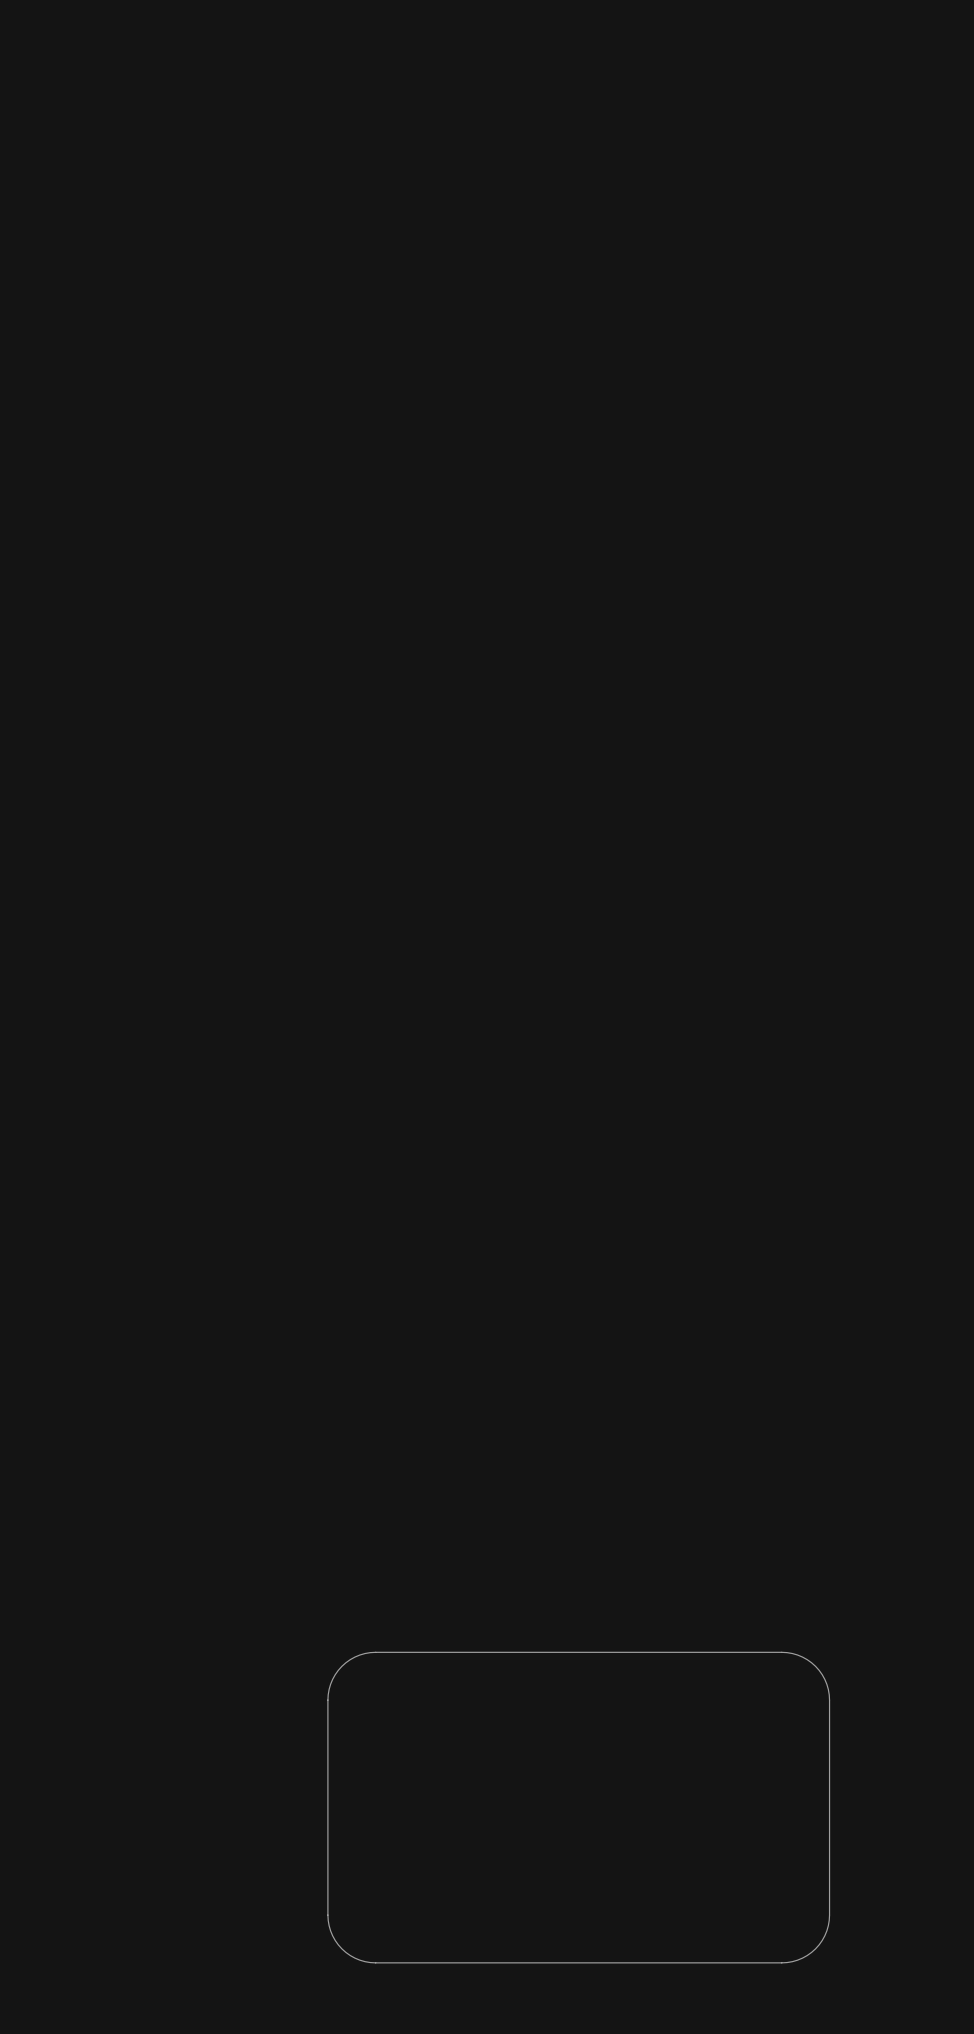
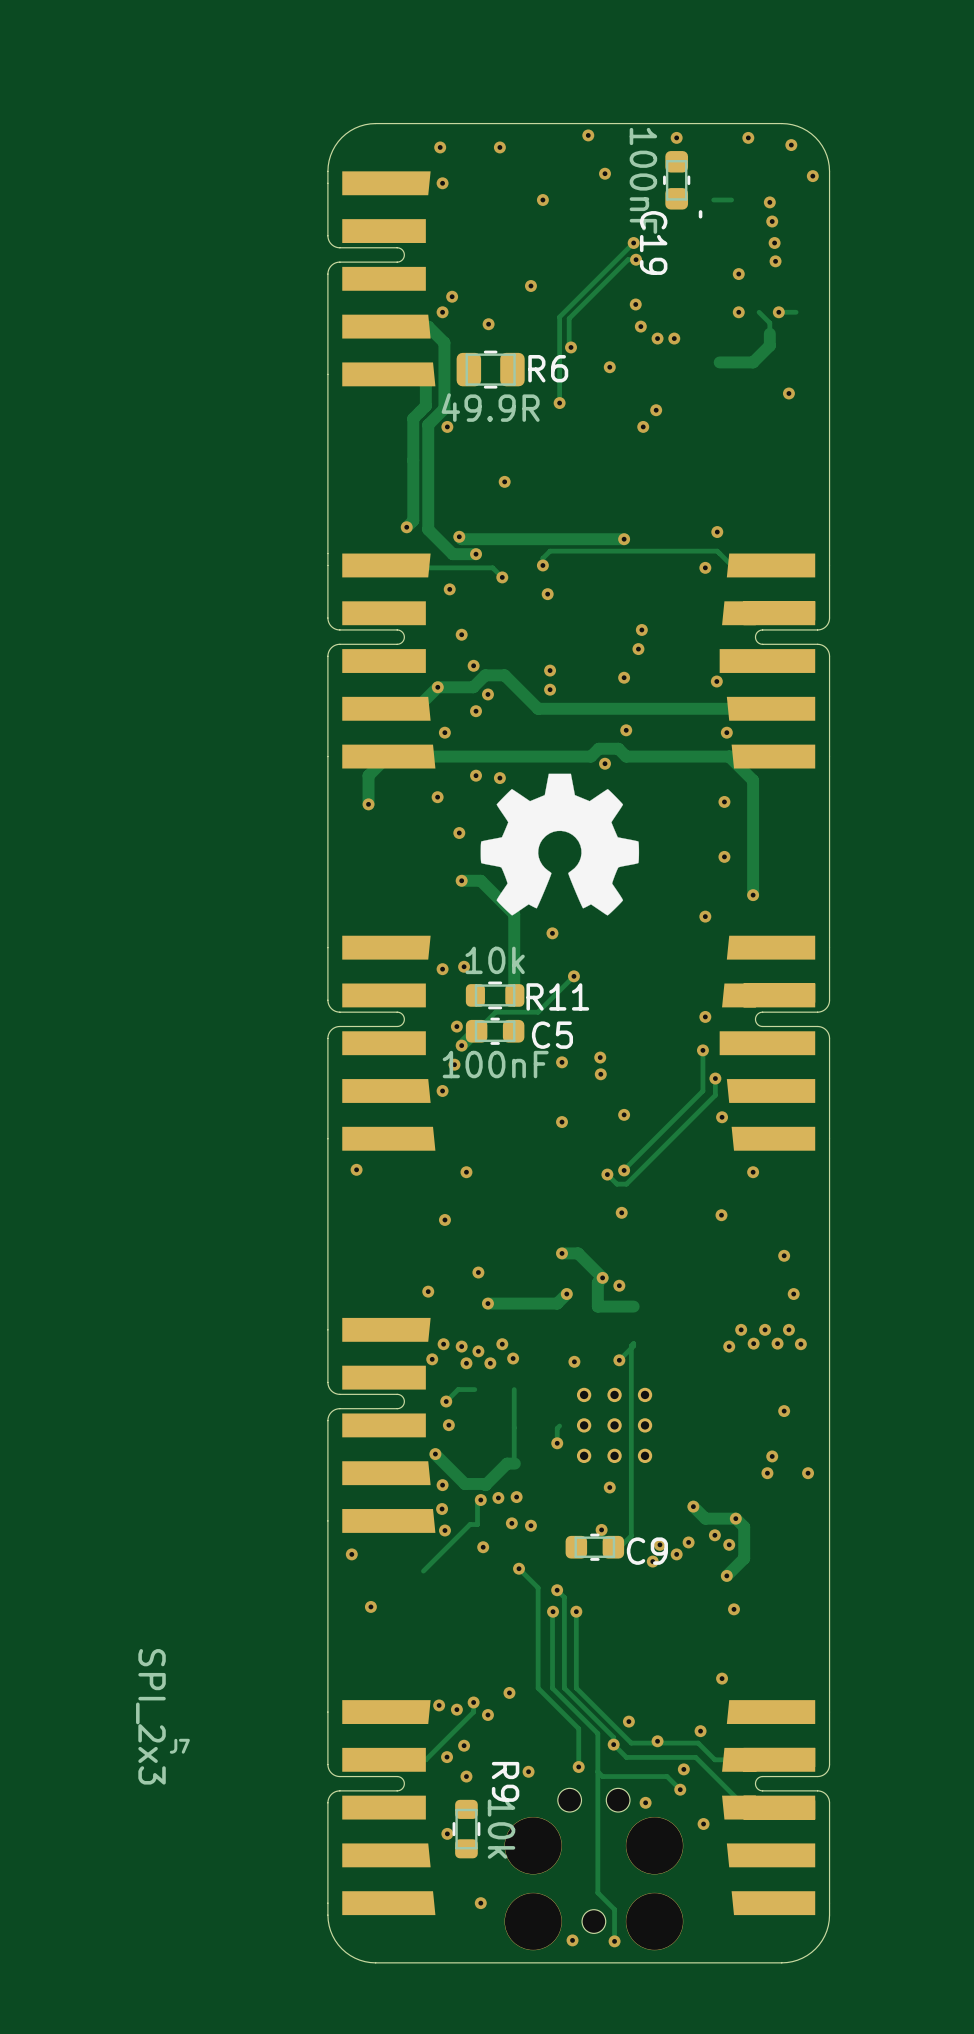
via: none -> (588, 135)
via: none -> (676, 137)
via: none -> (748, 137)
via: none -> (791, 145)
via: none -> (440, 147)
via: none -> (499, 147)
via: none -> (605, 173)
via: none -> (812, 176)
C19: none -> 100nF (676, 180)
board edge: none -> (327, 183) (329, 160) (338, 141) (354, 128) (370, 123) (781, 123) (797, 126) (811, 133) (824, 150) (829, 171) (829, 565)
via: none -> (442, 183)
via: none -> (542, 200)
track: none -> (731, 200) (713, 200)
via: none -> (769, 202)
line: none -> (700, 211) (700, 216)
via: none -> (772, 221)
track: none -> (633, 243) (559, 317) (559, 403)
via: none -> (633, 243)
via: none -> (774, 243)
track: none -> (636, 259) (628, 259) (569, 318) (569, 345) (571, 347)
via: none -> (636, 259)
via: none -> (775, 261)
via: none -> (738, 274)
part: none -> (381, 278)
via: none -> (530, 285)
via: none -> (452, 296)
via: none -> (635, 304)
via: none -> (442, 312)
via: none -> (738, 312)
track: none -> (759, 312) (769, 323) (769, 345) (753, 362) (719, 362)
via: none -> (778, 312)
track: none -> (796, 312) (778, 312)
via: none -> (488, 324)
track: none -> (385, 326) (428, 326) (444, 342) (444, 408) (428, 424) (428, 529) (452, 554) (476, 554)
via: none -> (640, 326)
via: none -> (657, 338)
via: none -> (674, 338)
via: none -> (571, 347)
via: none -> (609, 367)
R6: none -> 49.9R (490, 369)
board edge: none -> (327, 374) (327, 565)
track: none -> (387, 374) (416, 374) (425, 383) (425, 406) (413, 418) (413, 520) (406, 527)
via: none -> (788, 393)
via: none -> (559, 403)
via: none -> (656, 410)
via: none -> (447, 426)
via: none -> (643, 426)
via: none -> (504, 481)
via: none -> (406, 527)
via: none -> (717, 532)
track: none -> (459, 536) (461, 539) (624, 539)
via: none -> (459, 536)
via: none -> (624, 539)
via: none -> (476, 554)
track: none -> (385, 565) (387, 567) (492, 567) (502, 577)
via: none -> (542, 565)
track: none -> (772, 565) (731, 565) (717, 551) (550, 551) (542, 558) (542, 565)
via: none -> (705, 567)
via: none -> (502, 577)
via: none -> (449, 589)
via: none -> (547, 594)
via: none -> (641, 629)
via: none -> (461, 634)
via: none -> (638, 649)
part: none -> (381, 661)
part: none -> (774, 661)
via: none -> (473, 665)
via: none -> (550, 670)
via: none -> (624, 677)
via: none -> (716, 681)
via: none -> (437, 687)
via: none -> (550, 689)
via: none -> (487, 694)
track: none -> (772, 708) (538, 708) (504, 675) (485, 675) (473, 687) (437, 687) (416, 708) (385, 708)
via: none -> (476, 711)
via: none -> (626, 730)
via: none -> (444, 732)
via: none -> (726, 732)
board edge: none -> (327, 756) (327, 947)
track: none -> (729, 756) (753, 780) (753, 895)
track: none -> (774, 756) (626, 756) (618, 748) (598, 748) (590, 756) (387, 756) (368, 775) (368, 804)
board edge: none -> (829, 756) (829, 947)
via: none -> (605, 763)
drawing: none -> [480, 773, 640, 916]
via: none -> (476, 775)
via: none -> (499, 778)
via: none -> (437, 797)
via: none -> (724, 801)
via: none -> (368, 804)
via: none -> (459, 833)
via: none -> (724, 856)
track: none -> (461, 880) (480, 880) (514, 914) (514, 995)
via: none -> (461, 880)
via: none -> (753, 895)
via: none -> (705, 916)
via: none -> (552, 933)
via: none -> (464, 966)
via: none -> (442, 969)
track: none -> (573, 976) (538, 1012) (495, 1012) (461, 1045)
via: none -> (573, 976)
R11: none -> 10k (495, 995)
via: none -> (705, 1016)
via: none -> (456, 1026)
C5: none -> 100nF (495, 1031)
part: none -> (381, 1043)
part: none -> (774, 1043)
via: none -> (461, 1045)
track: none -> (702, 1050) (702, 1090) (624, 1170)
via: none -> (702, 1050)
via: none -> (600, 1057)
via: none -> (562, 1062)
via: none -> (454, 1064)
via: none -> (600, 1074)
track: none -> (715, 1078) (715, 1095) (626, 1184) (616, 1184) (607, 1174)
via: none -> (715, 1078)
via: none -> (442, 1090)
via: none -> (624, 1114)
via: none -> (722, 1117)
via: none -> (562, 1122)
board edge: none -> (829, 1138) (829, 1700)
via: none -> (356, 1169)
via: none -> (624, 1170)
via: none -> (466, 1172)
via: none -> (753, 1172)
via: none -> (607, 1174)
via: none -> (621, 1212)
via: none -> (721, 1215)
via: none -> (444, 1219)
track: none -> (562, 1253) (578, 1253) (602, 1277) (597, 1282) (597, 1306) (633, 1306)
via: none -> (562, 1253)
via: none -> (784, 1255)
via: none -> (478, 1272)
via: none -> (602, 1277)
via: none -> (619, 1285)
via: none -> (428, 1291)
track: none -> (566, 1294) (557, 1303) (487, 1303)
via: none -> (566, 1294)
via: none -> (793, 1294)
via: none -> (487, 1303)
via: none -> (741, 1329)
via: none -> (765, 1329)
via: none -> (788, 1329)
via: none -> (753, 1343)
via: none -> (777, 1343)
via: none -> (443, 1344)
via: none -> (502, 1344)
via: none -> (800, 1344)
via: none -> (461, 1346)
via: none -> (729, 1346)
via: none -> (478, 1351)
via: none -> (513, 1358)
via: none -> (432, 1359)
track: none -> (619, 1360) (633, 1345) (633, 1343) (631, 1345) (631, 1535) (619, 1547) (613, 1547) (601, 1535) (601, 1529)
via: none -> (619, 1360)
via: none -> (574, 1361)
via: none -> (466, 1363)
via: none -> (490, 1363)
track: none -> (474, 1389) (458, 1389) (446, 1401)
track: none -> (514, 1389) (514, 1463) (507, 1463) (485, 1485) (464, 1483) (435, 1454)
via: none -> (446, 1401)
via: none -> (784, 1411)
part: none -> (381, 1425)
via: none -> (448, 1425)
part: none -> (614, 1425)
track: none -> (559, 1426) (557, 1428) (557, 1443)
via: none -> (557, 1443)
via: none -> (435, 1454)
via: none -> (772, 1456)
via: none -> (767, 1473)
via: none -> (808, 1473)
via: none -> (442, 1485)
via: none -> (609, 1487)
via: none -> (498, 1497)
via: none -> (516, 1497)
track: none -> (480, 1500) (477, 1503) (477, 1524) (470, 1524) (423, 1571)
via: none -> (480, 1500)
track: none -> (693, 1506) (705, 1518) (735, 1518) (744, 1527) (744, 1558) (726, 1575)
via: none -> (693, 1506)
via: none -> (442, 1509)
via: none -> (735, 1518)
via: none -> (511, 1523)
via: none -> (530, 1525)
via: none -> (601, 1529)
via: none -> (444, 1530)
via: none -> (714, 1535)
via: none -> (688, 1542)
via: none -> (659, 1544)
via: none -> (729, 1544)
via: none -> (483, 1547)
C9: none -> (594, 1547)
via: none -> (351, 1554)
via: none -> (676, 1554)
via: none -> (652, 1561)
track: none -> (519, 1568) (538, 1587) (538, 1688) (578, 1728) (578, 1766)
via: none -> (519, 1568)
via: none -> (726, 1575)
track: none -> (557, 1590) (564, 1597) (564, 1688) (613, 1737) (613, 1744) (626, 1757) (695, 1757) (745, 1807) (779, 1807)
via: none -> (557, 1590)
via: none -> (370, 1606)
via: none -> (734, 1609)
track: none -> (553, 1611) (552, 1688) (597, 1733) (597, 1892) (614, 1909) (614, 1941)
via: none -> (553, 1611)
track: none -> (576, 1611) (576, 1688) (631, 1743) (698, 1743) (714, 1759) (779, 1759)
via: none -> (576, 1611)
via: none -> (722, 1678)
via: none -> (509, 1692)
board edge: (829, 1700) (824, 1679) (815, 1666) (802, 1657) (781, 1652) (370, 1652) (354, 1657) (341, 1666) (332, 1679) (327, 1700) -> (327, 1520) (327, 1700)
track: none -> (473, 1702) (473, 1712) (425, 1759) (384, 1759)
via: none -> (473, 1702)
via: none -> (439, 1705)
via: none -> (456, 1709)
board edge: (327, 1712) (327, 1903) -> (327, 1138) (327, 1329)
board edge: (829, 1712) (829, 1903) -> none
via: none -> (487, 1715)
via: none -> (628, 1721)
via: none -> (700, 1731)
via: none -> (657, 1741)
via: none -> (613, 1744)
via: none -> (464, 1745)
via: none -> (447, 1757)
via: none -> (578, 1766)
via: none -> (683, 1769)
via: none -> (528, 1771)
track: none -> (597, 1771) (602, 1776) (667, 1776) (680, 1789)
via: none -> (466, 1776)
via: none -> (680, 1789)
via: none -> (645, 1802)
J7: none -> SPI_2x3 (381, 1807)
part: none -> (776, 1807)
via: none -> (703, 1824)
R9: none -> 10k (466, 1829)
via: none -> (447, 1833)
part: none -> (593, 1869)
via: none -> (480, 1903)
via: none -> (572, 1940)
via: none -> (614, 1941)

